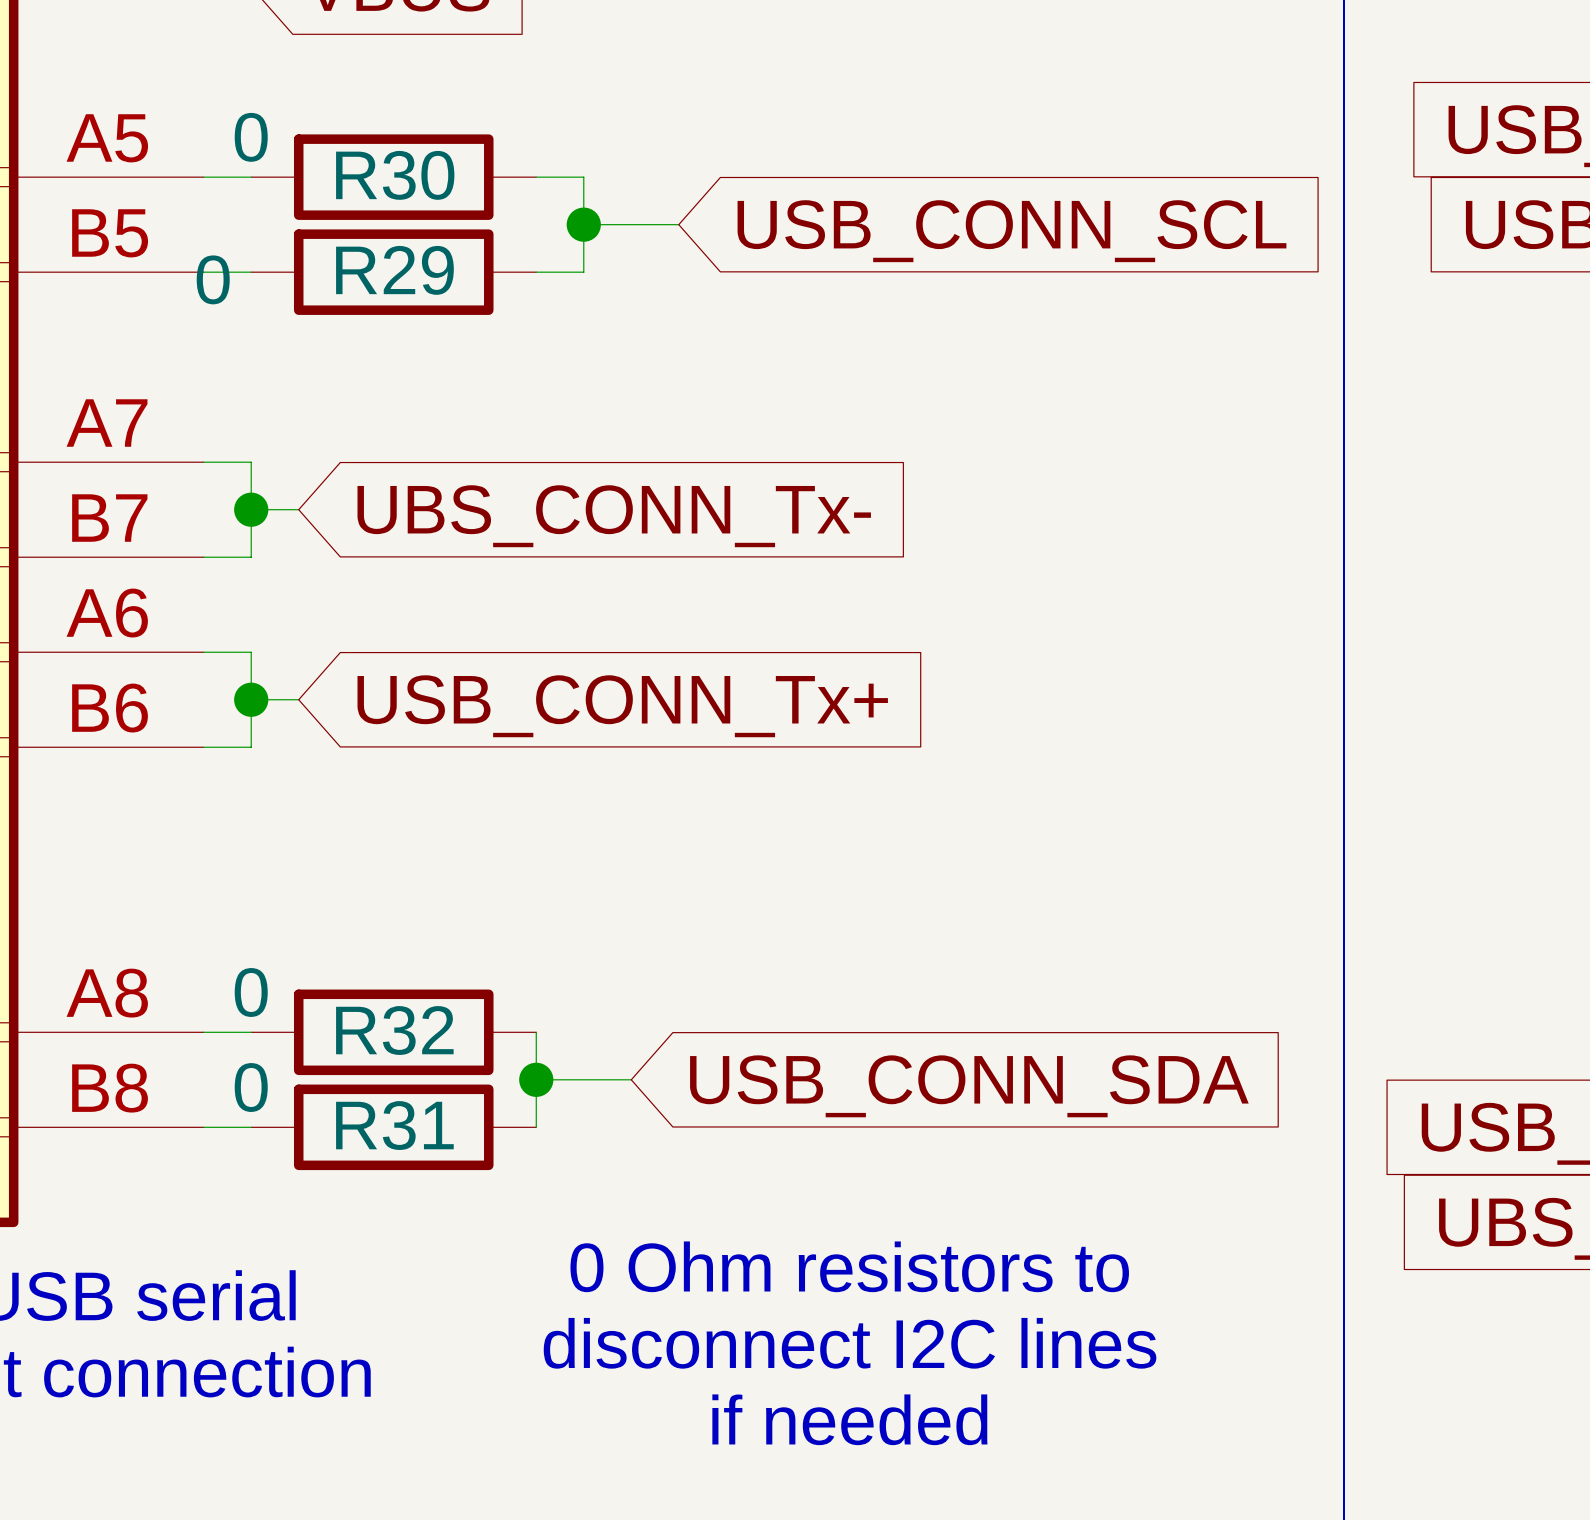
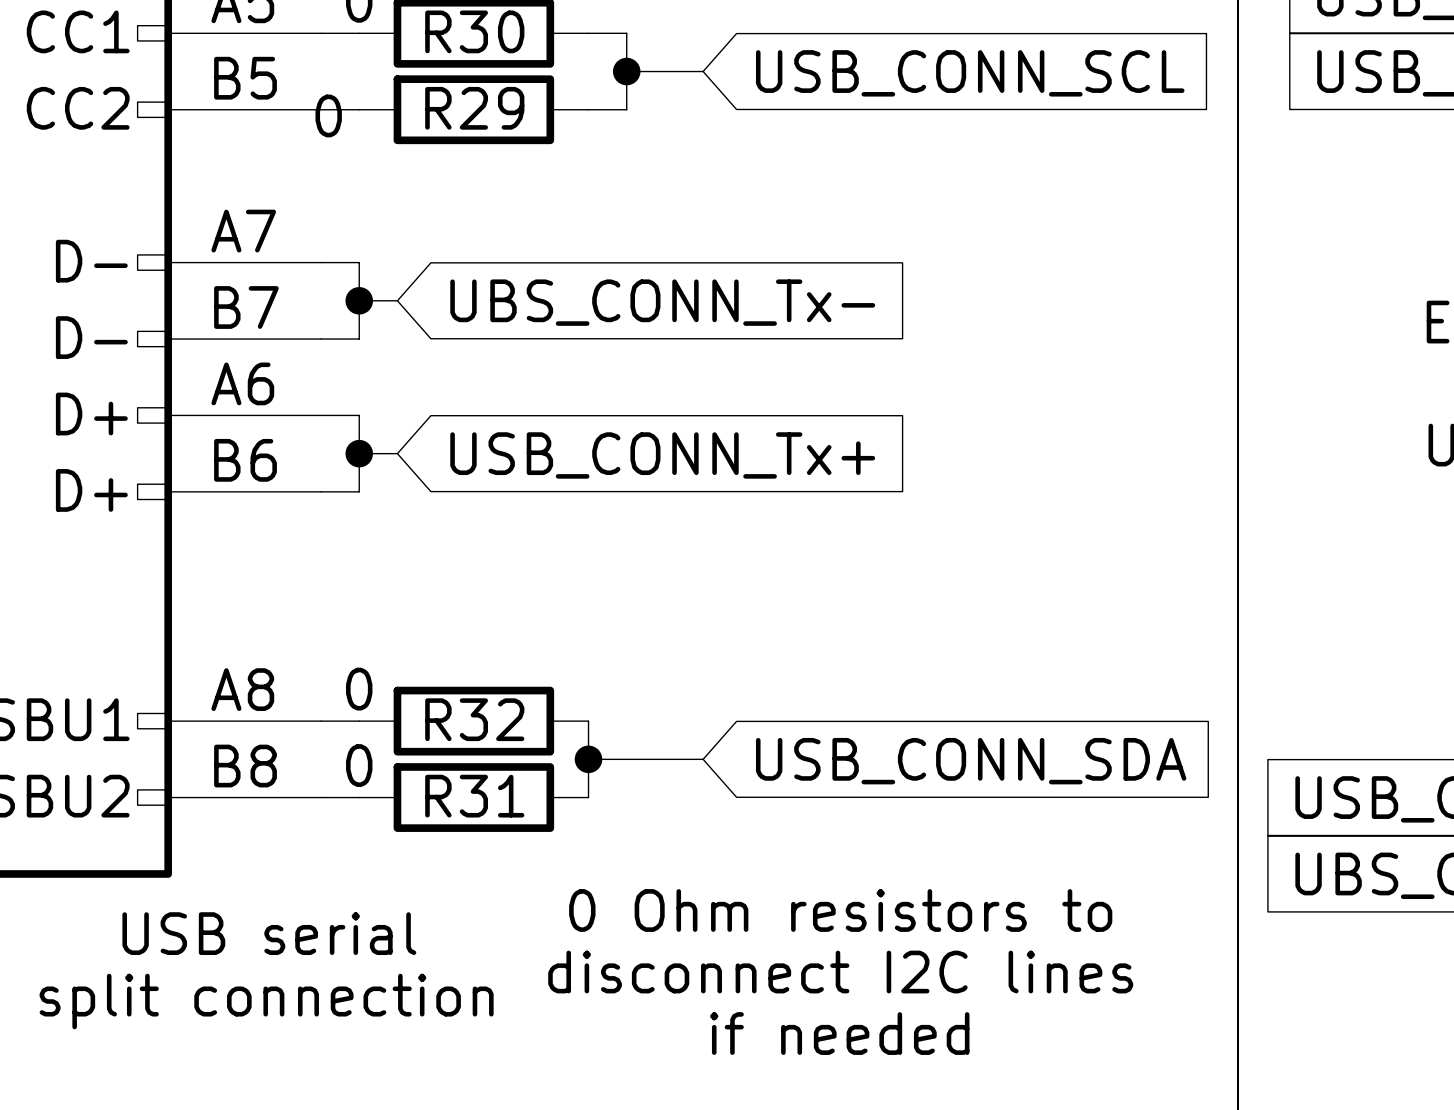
wire: none -> (664, 759) (703, 759)
global label position: USB_CONN_SDA (969, 1086) -> USB_CONN_SDA (971, 761)

